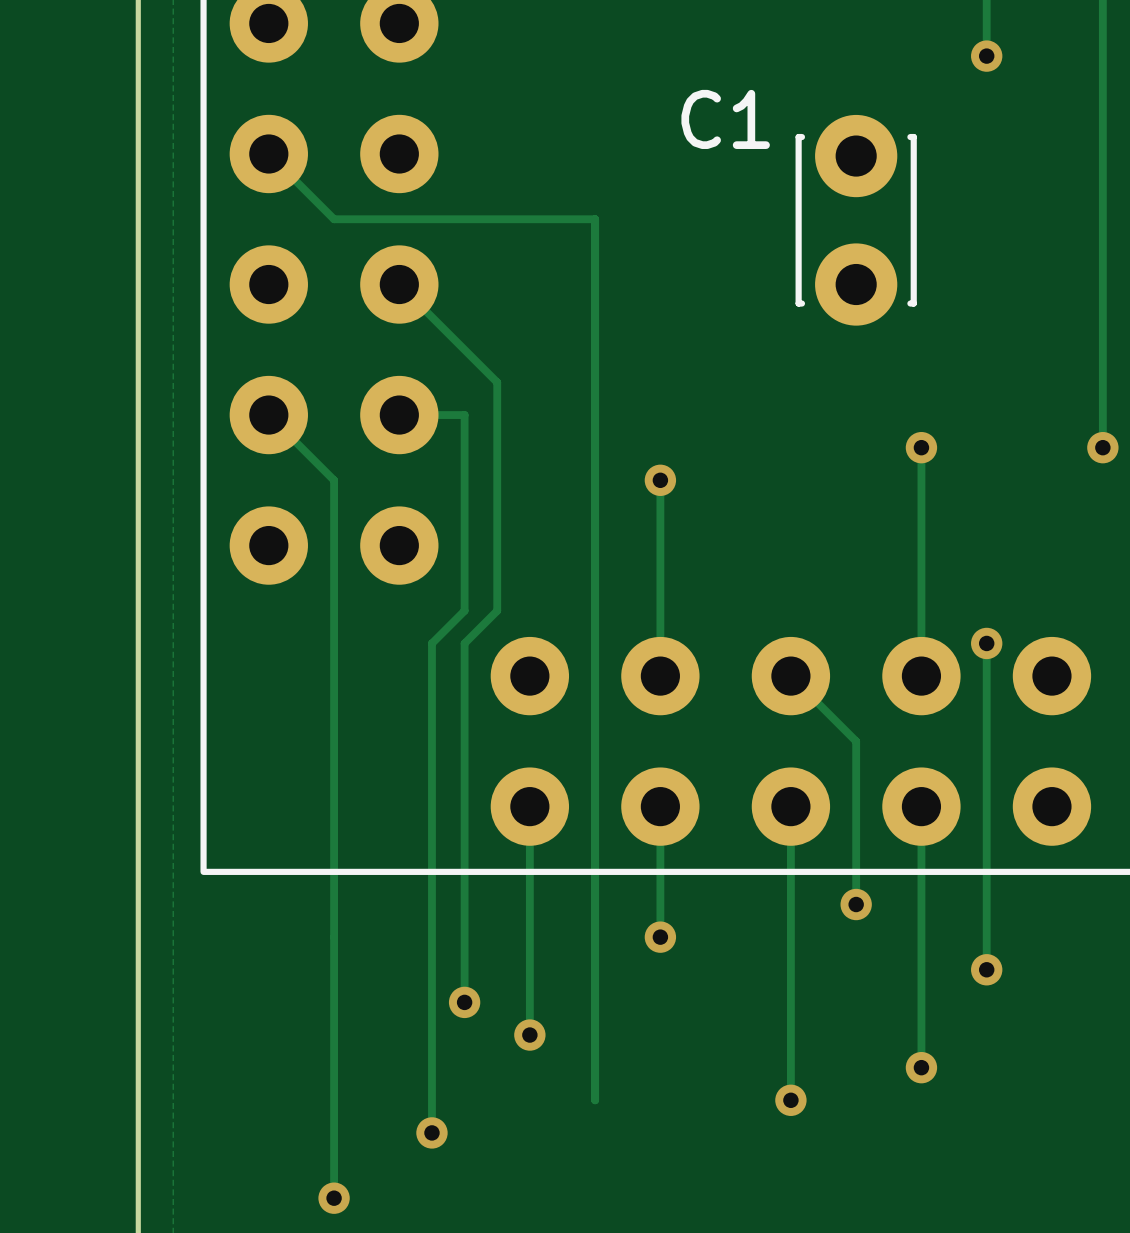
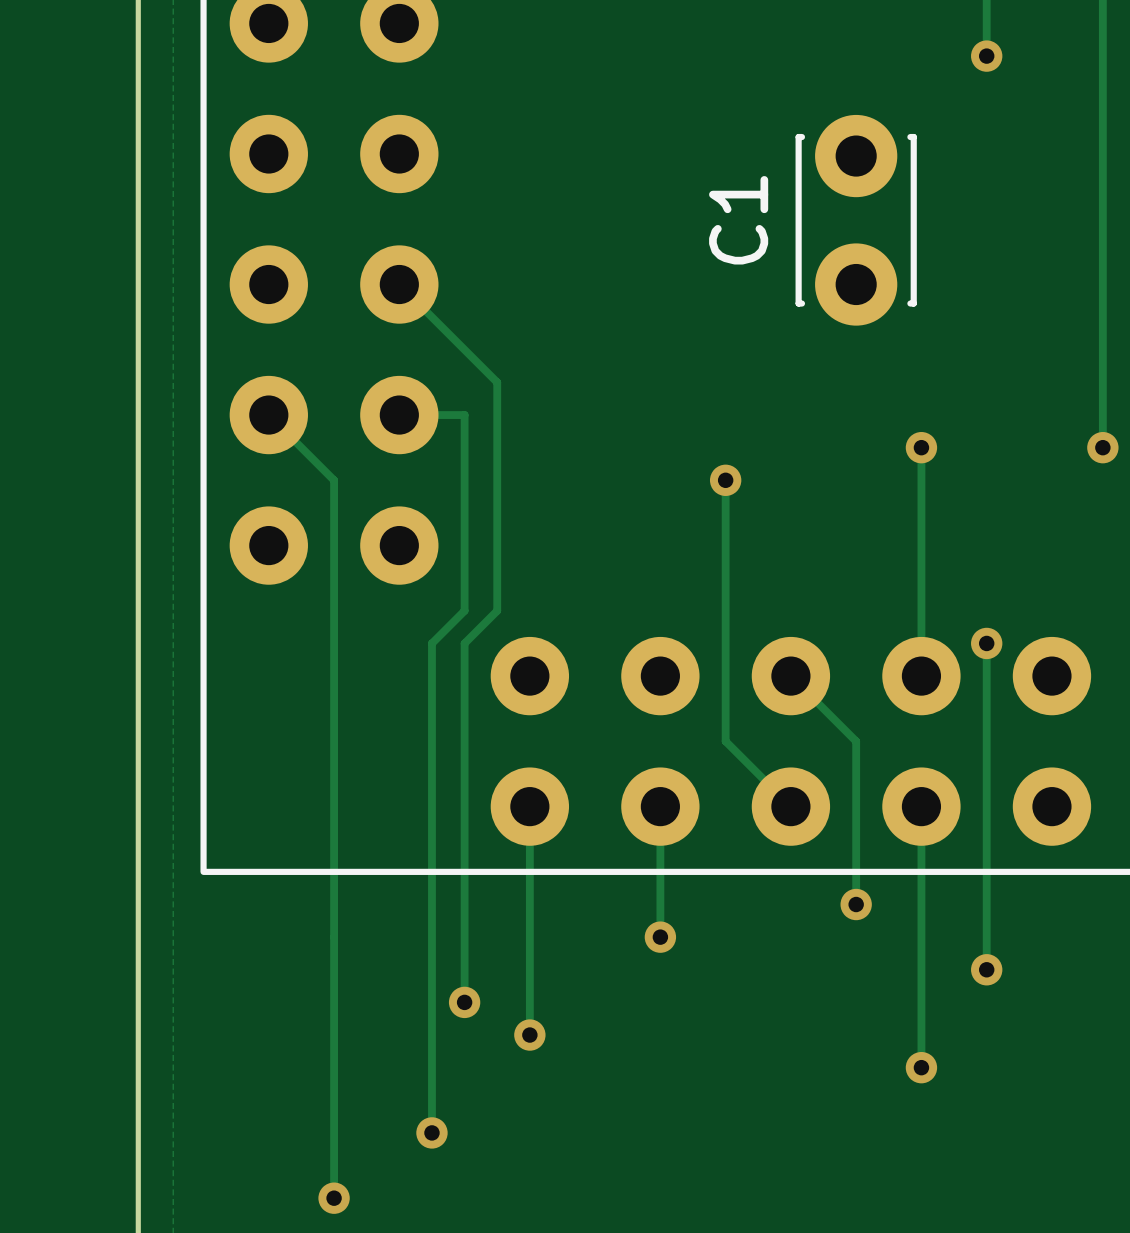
C1 name rotation: 0° (725, 119) -> 90° counterclockwise (738, 220)
track: (268, 153) (334, 219) (595, 219) (595, 1100) -> none
track: (660, 480) (660, 676) -> none
via position: (660, 480) -> (725, 480)
track: (790, 806) (790, 1100) -> (790, 806) (725, 741) (725, 480)
via: (790, 1100) -> none

